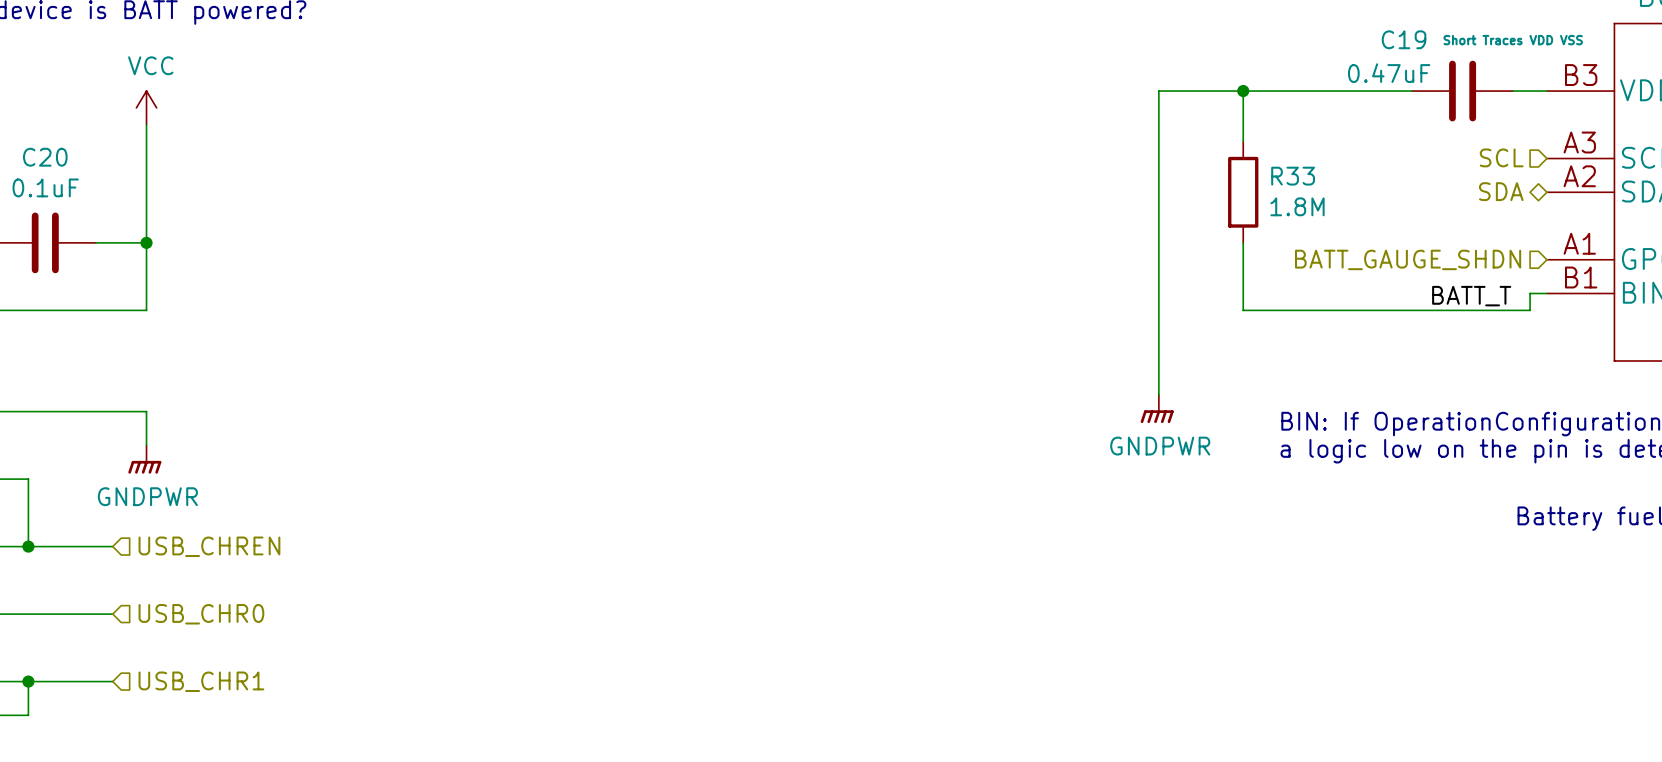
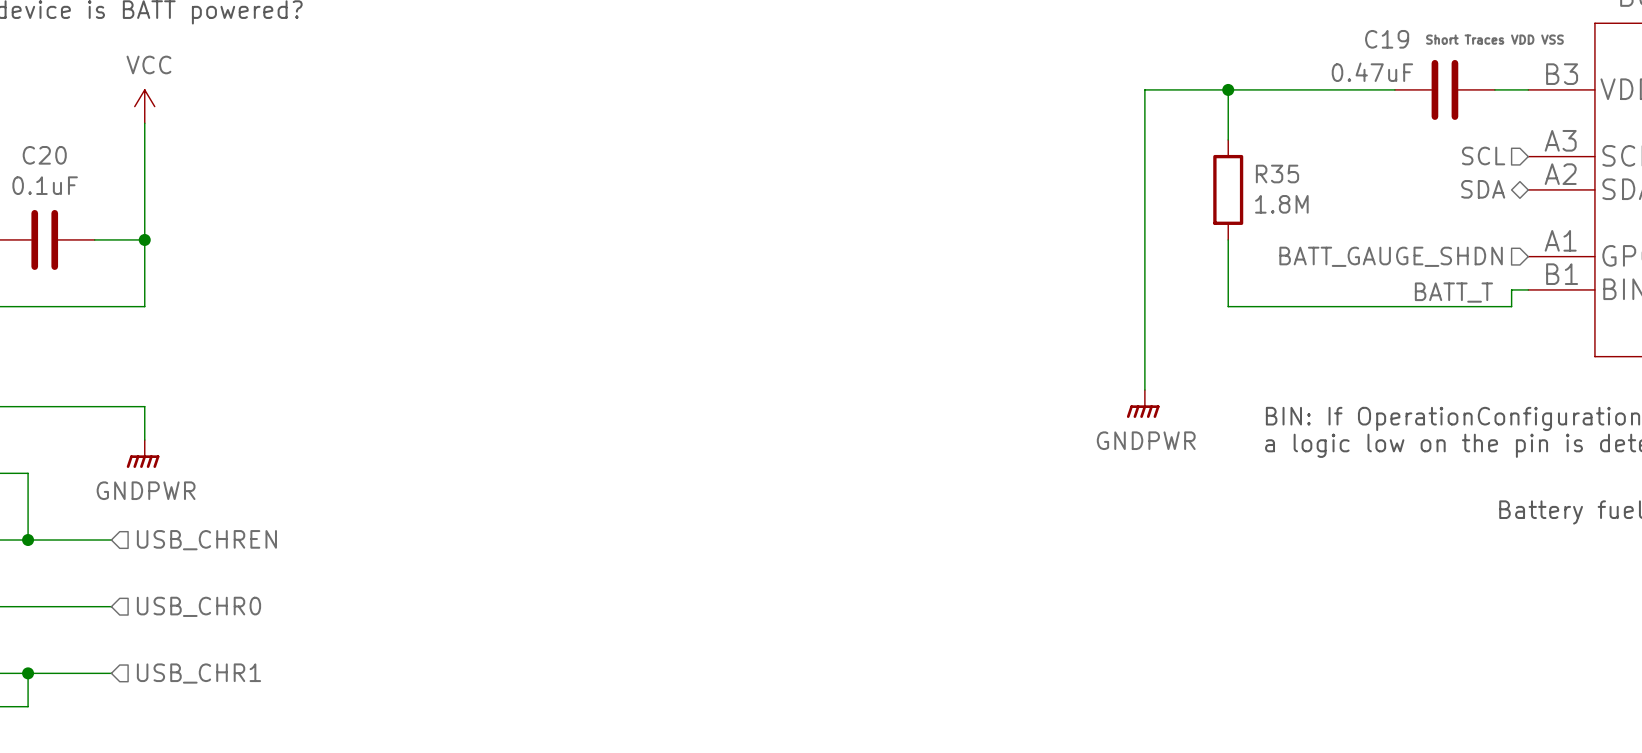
R33 name: R33 (1293, 176) -> R35 (1277, 173)

